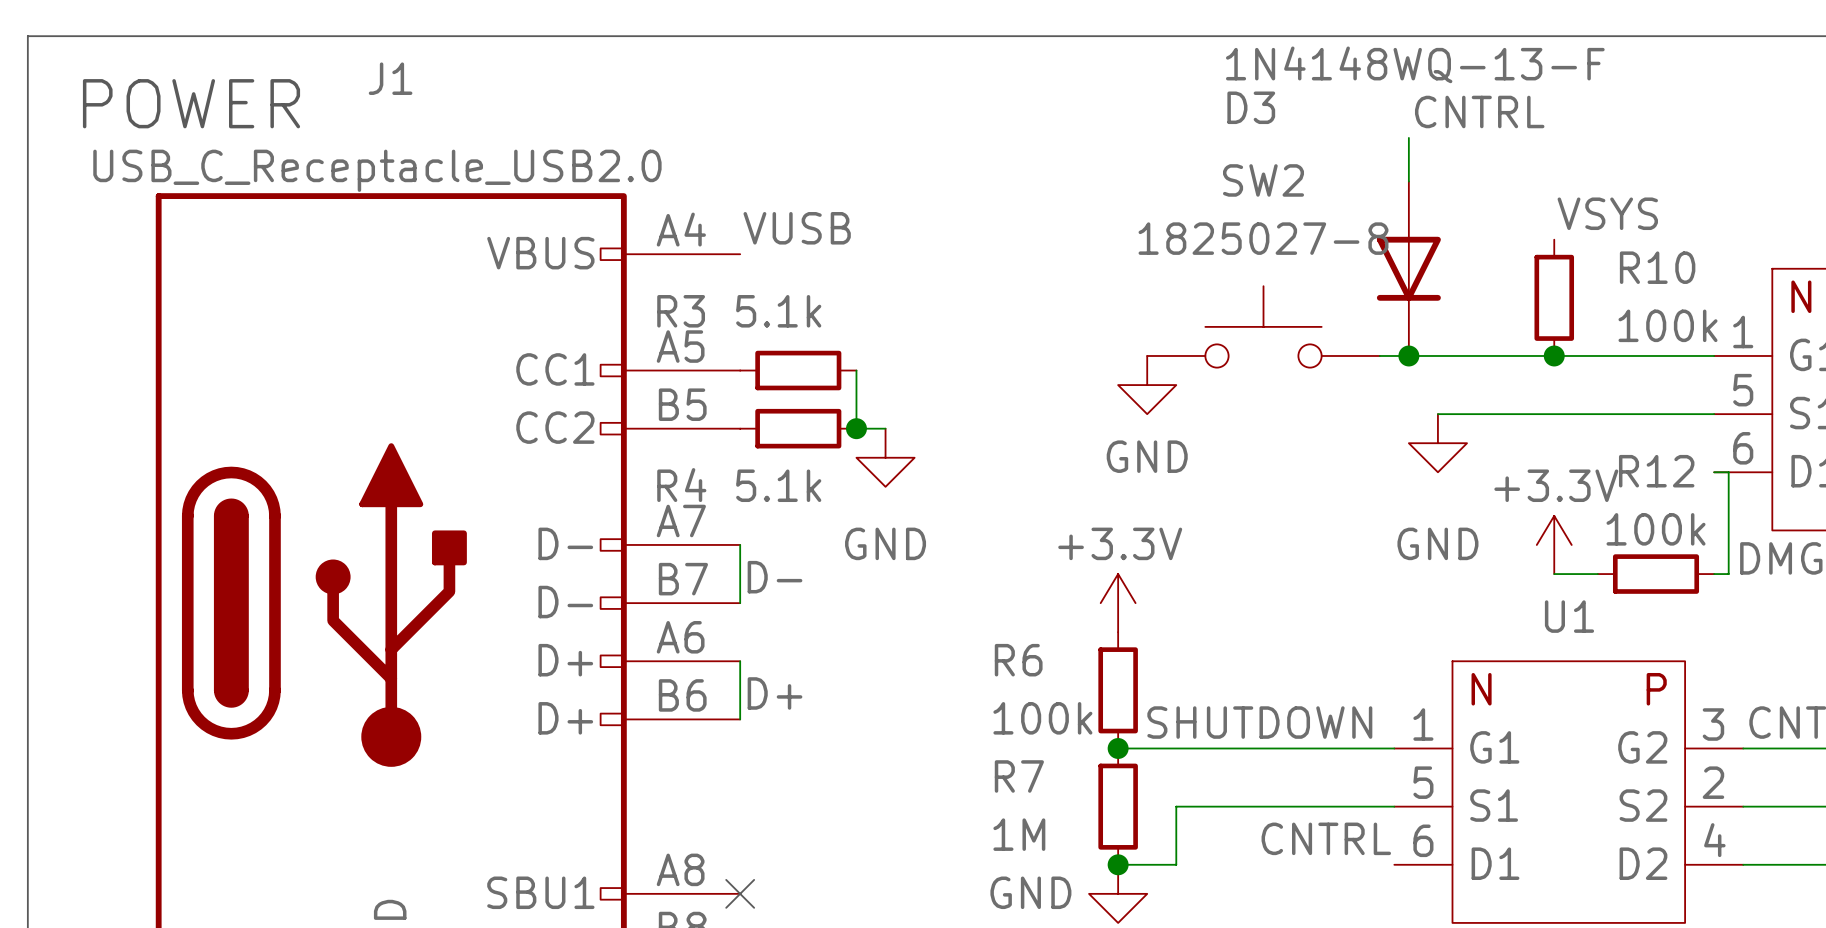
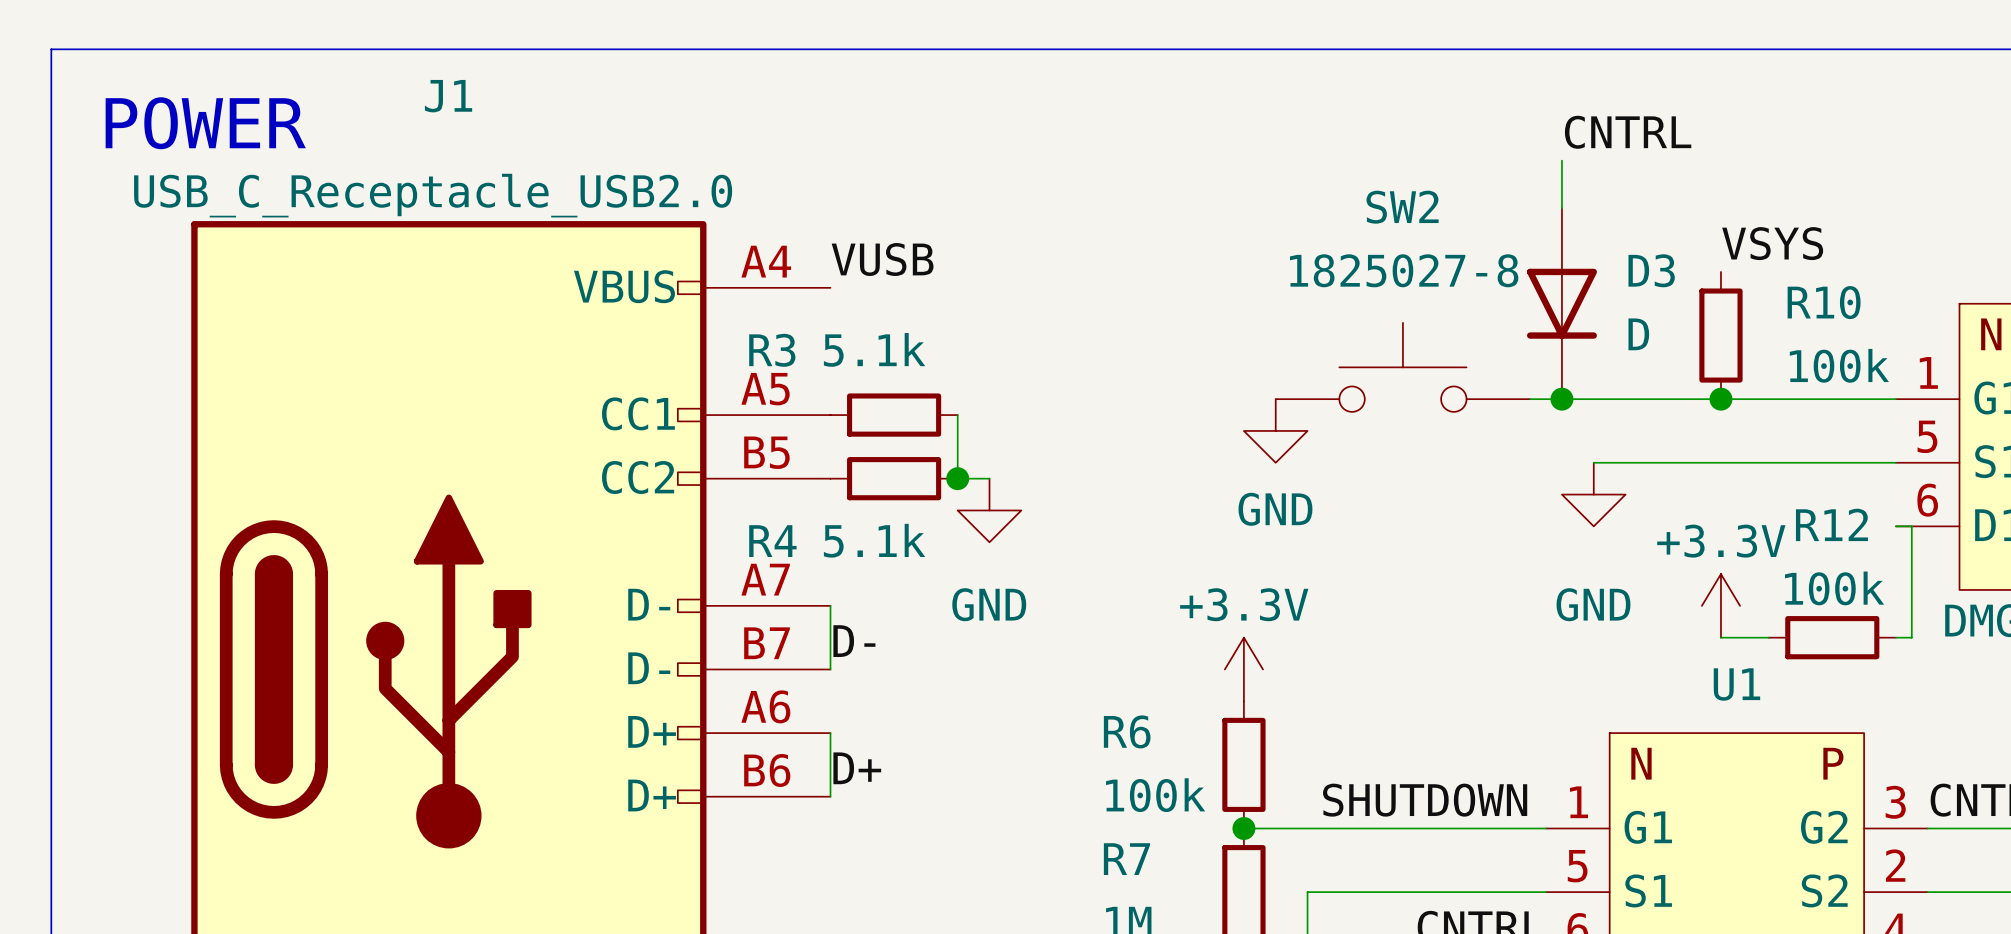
D3 value: 1N4148WQ-13-F (1415, 64) -> D (1638, 334)
D3 name position: D3 (1251, 107) -> D3 (1651, 270)

